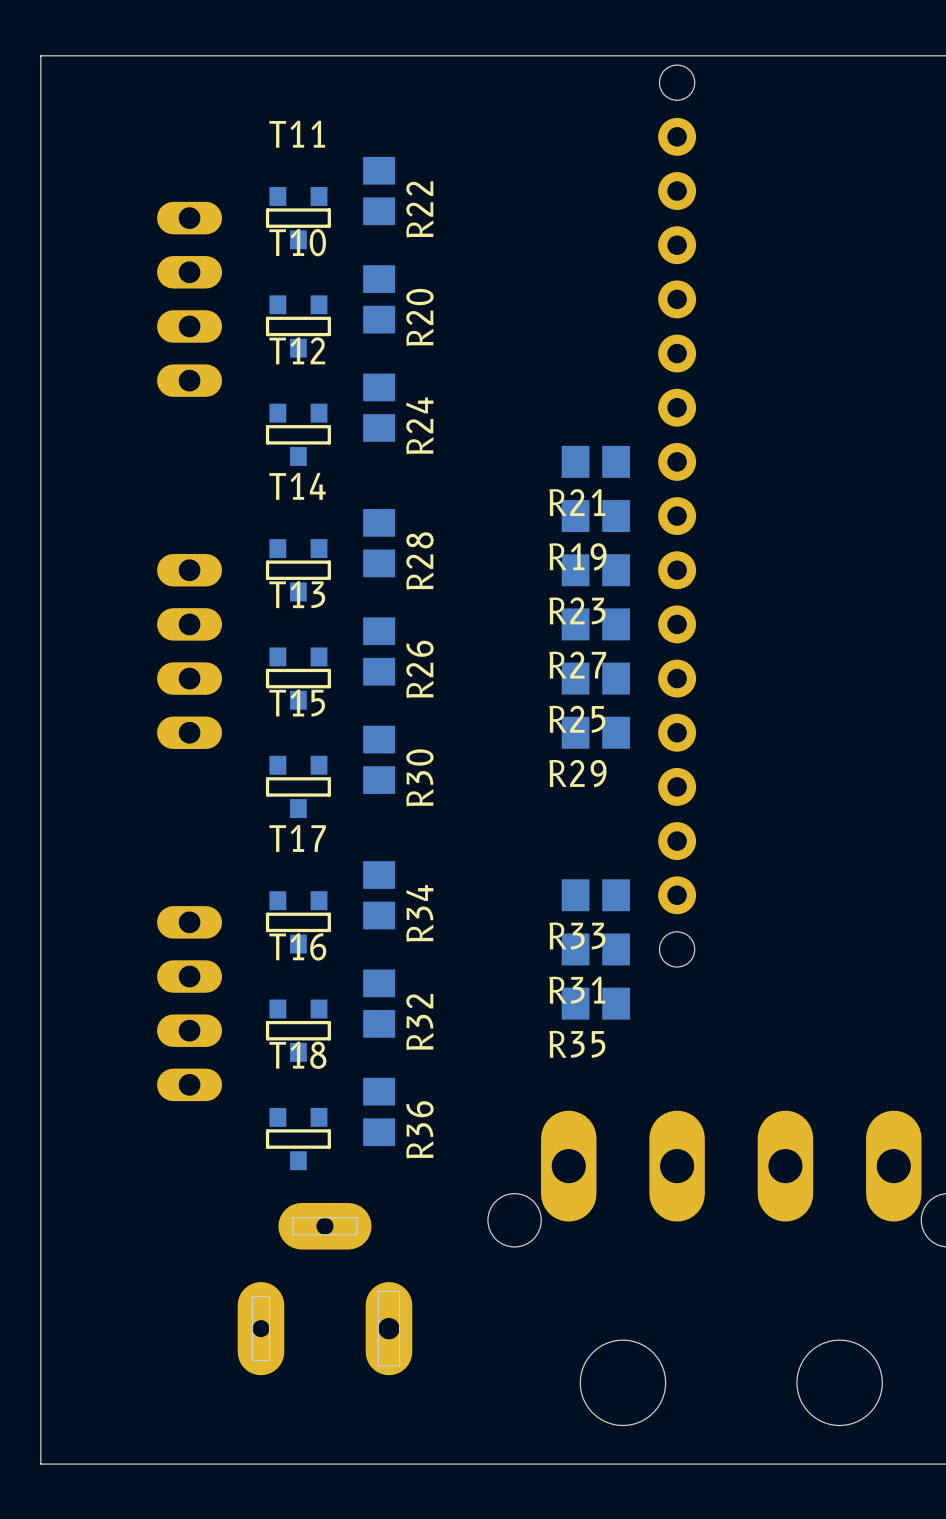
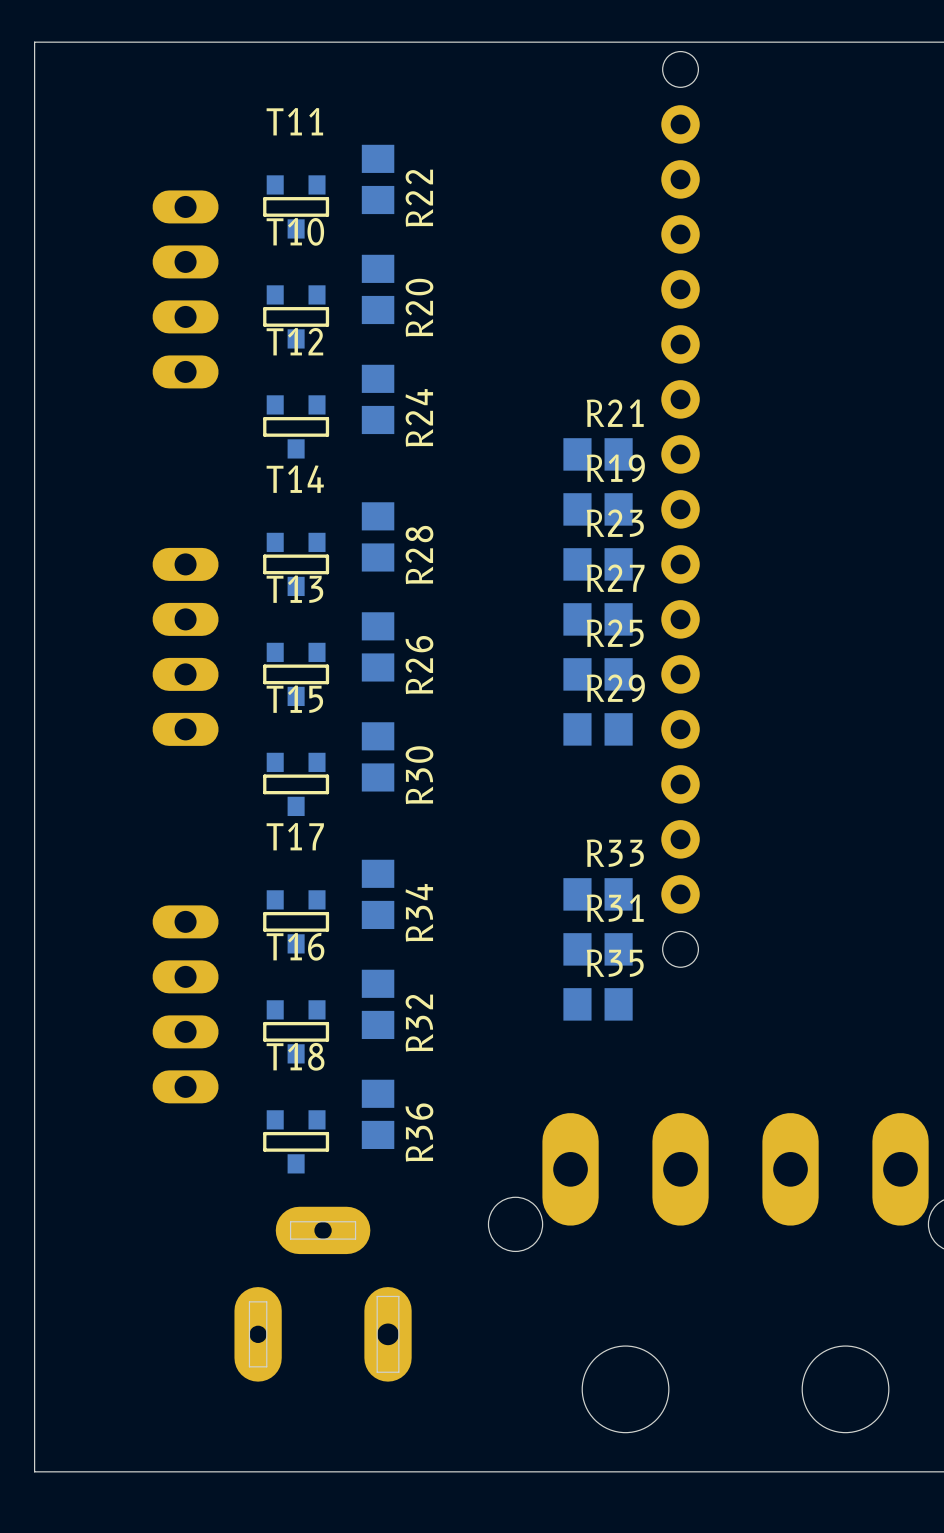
R21 name position: R21 (577, 502) -> R21 (615, 413)
R19 name position: R19 (577, 556) -> R19 (615, 468)
R23 name position: R23 (577, 610) -> R23 (615, 523)
R27 name position: R27 (577, 665) -> R27 (615, 578)
R25 name position: R25 (577, 719) -> R25 (615, 633)
R29 name position: R29 (577, 773) -> R29 (615, 688)
R33 name position: R33 (577, 935) -> R33 (615, 853)
R31 name position: R31 (577, 990) -> R31 (615, 908)
R35 name position: R35 (577, 1044) -> R35 (615, 963)

